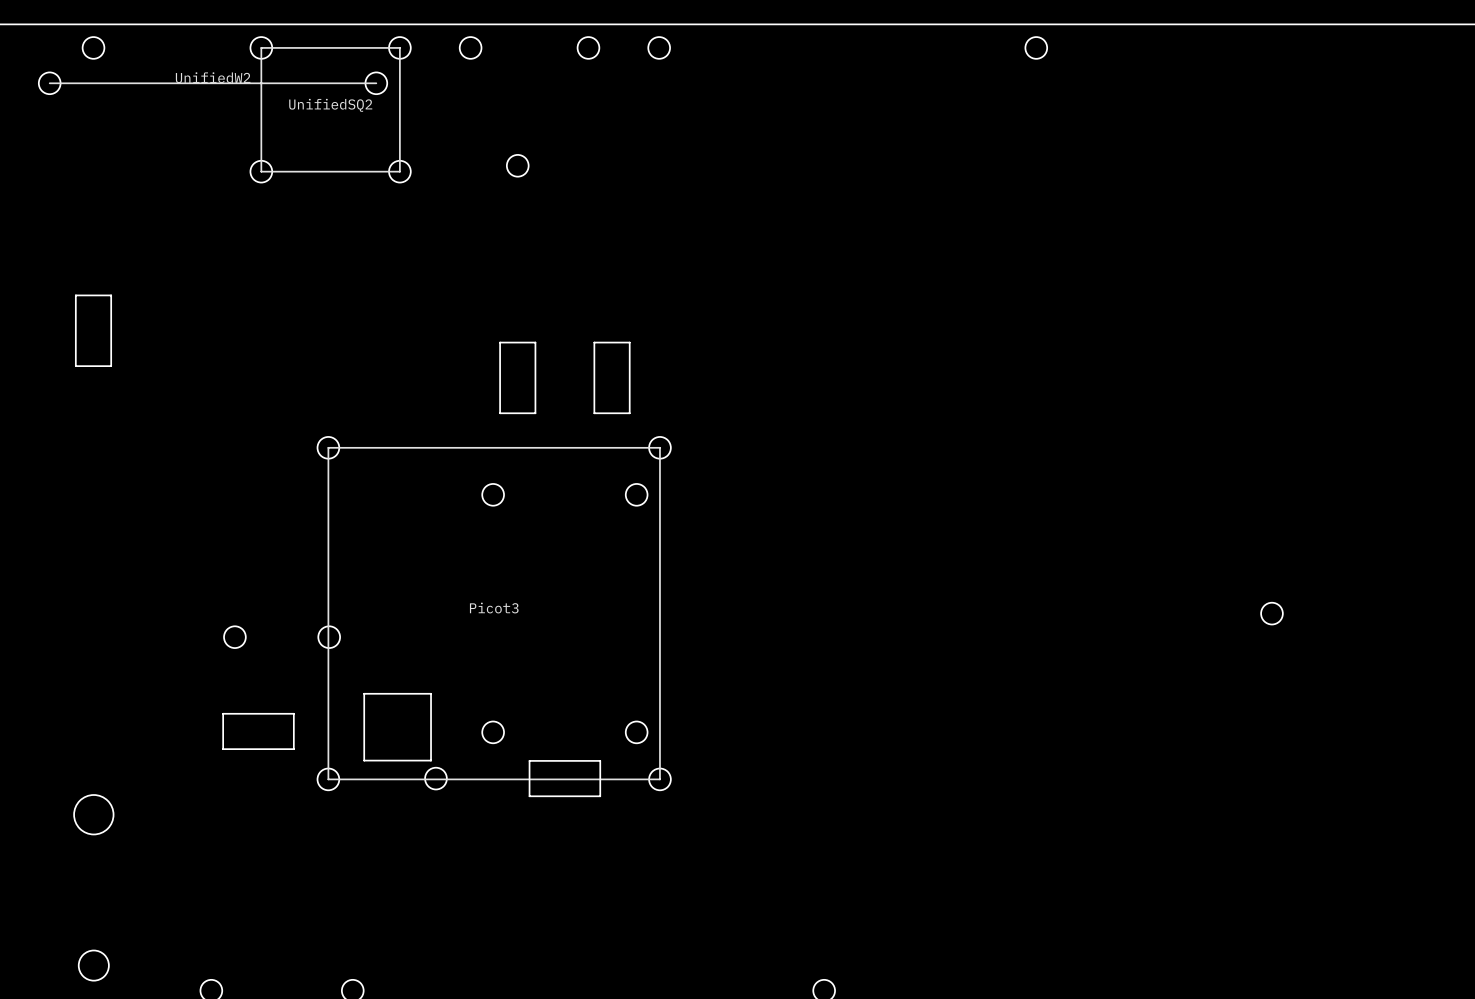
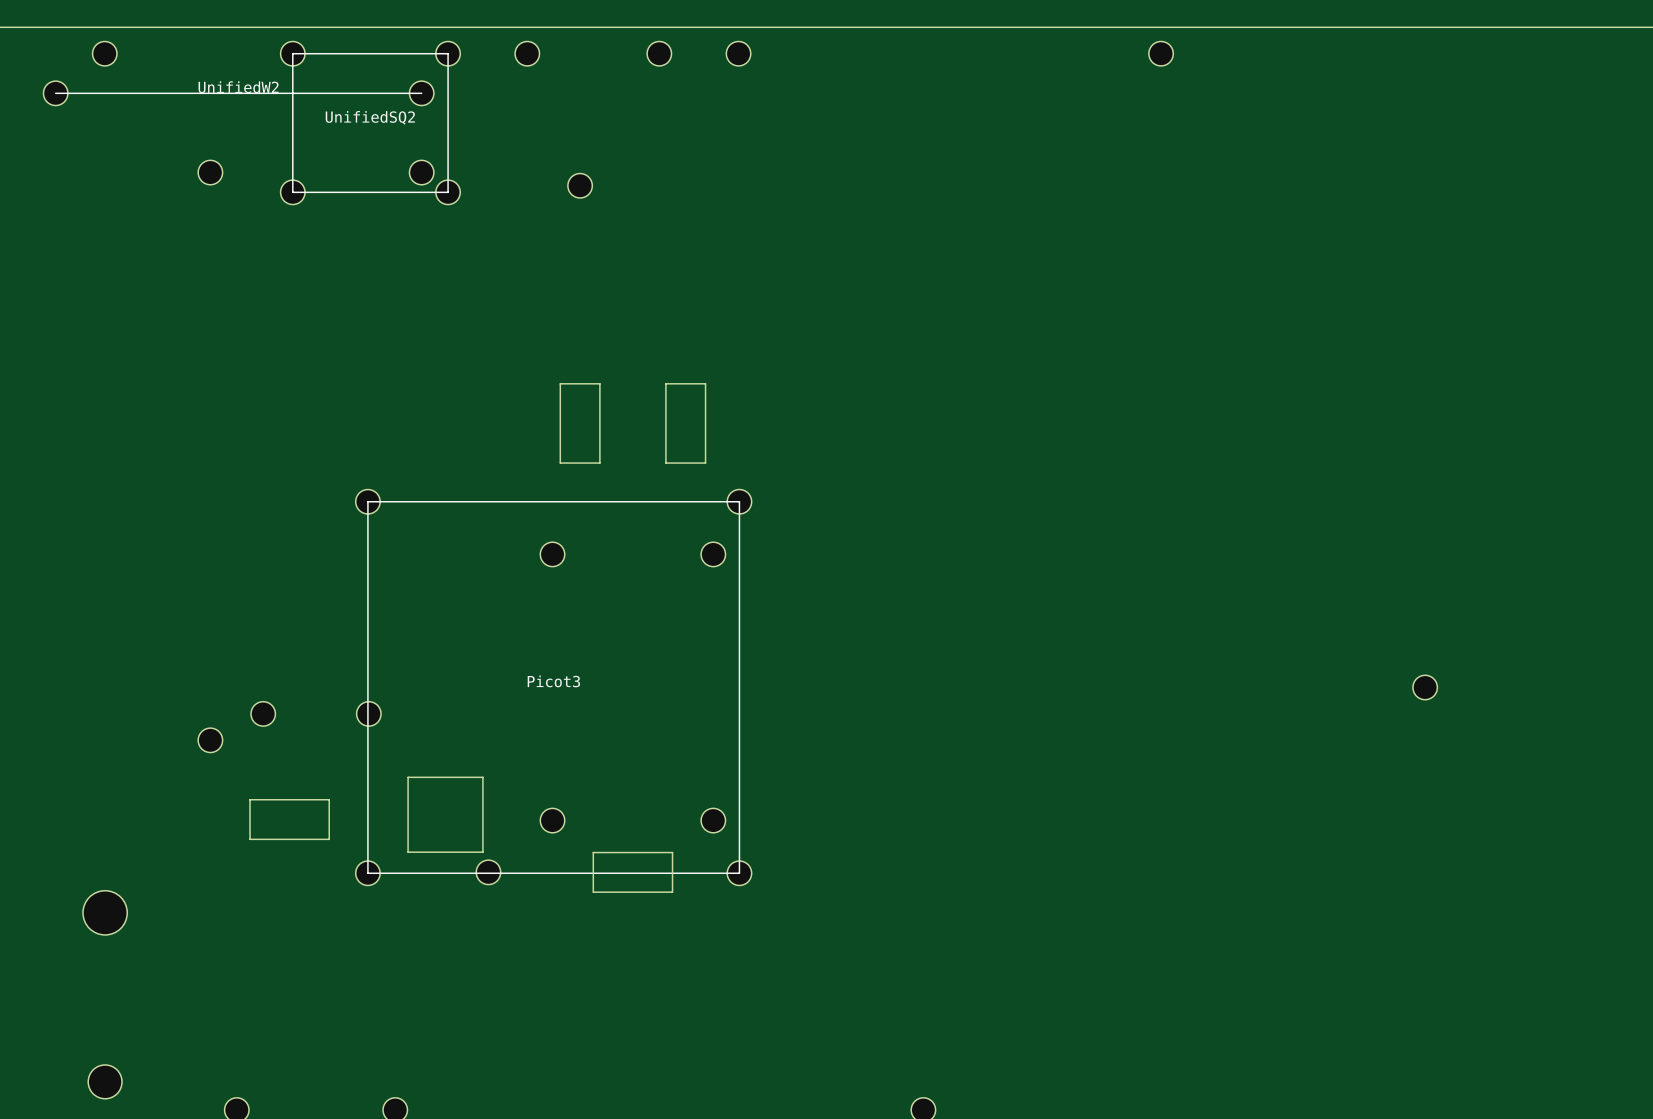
part: none -> (210, 172)
part: none -> (421, 172)
board edge: (75, 295) (75, 366) (111, 366) (111, 295) (75, 295) -> none
part: none -> (210, 740)

